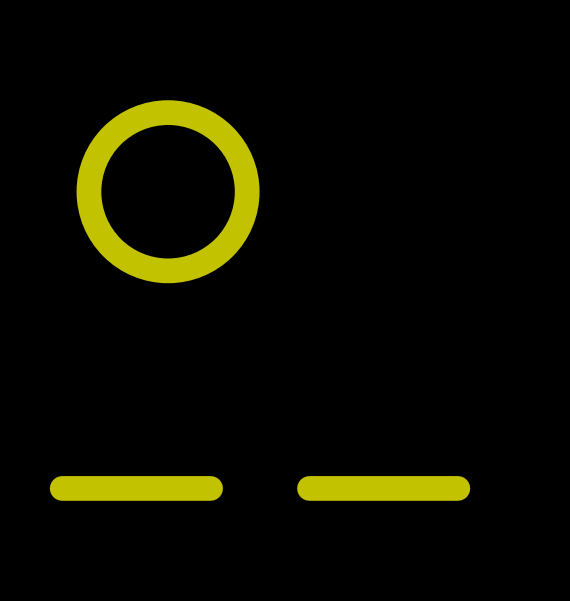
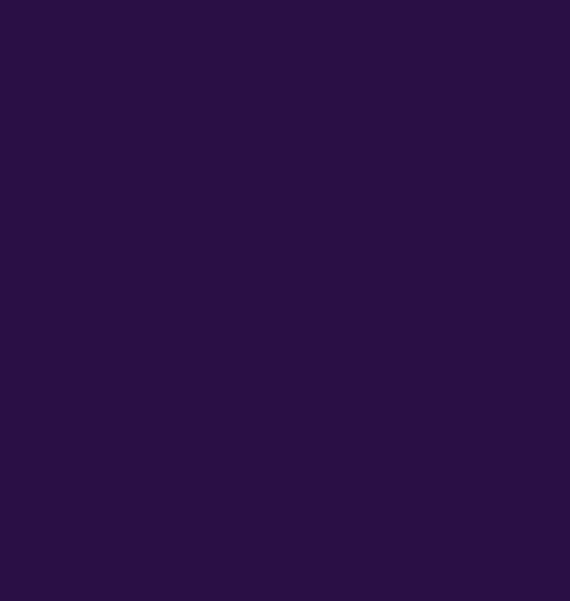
round board edge: [76, 100, 260, 284] -> none
board edge: (62, 488) (210, 488) -> none
board edge: (309, 488) (457, 488) -> none

